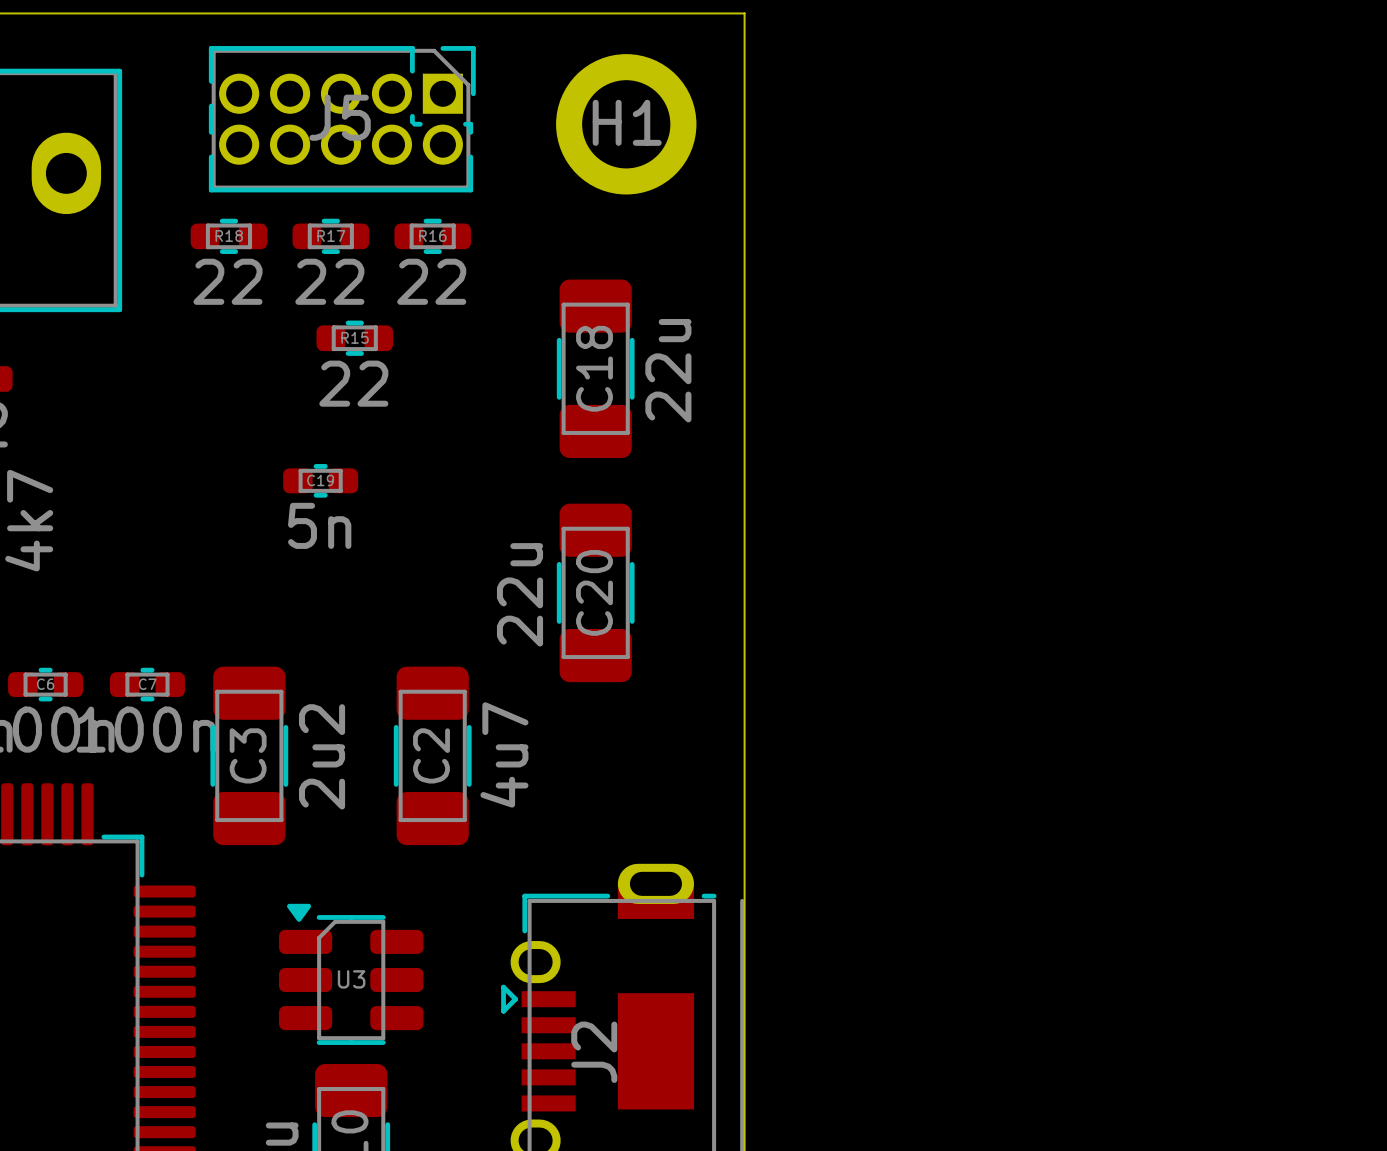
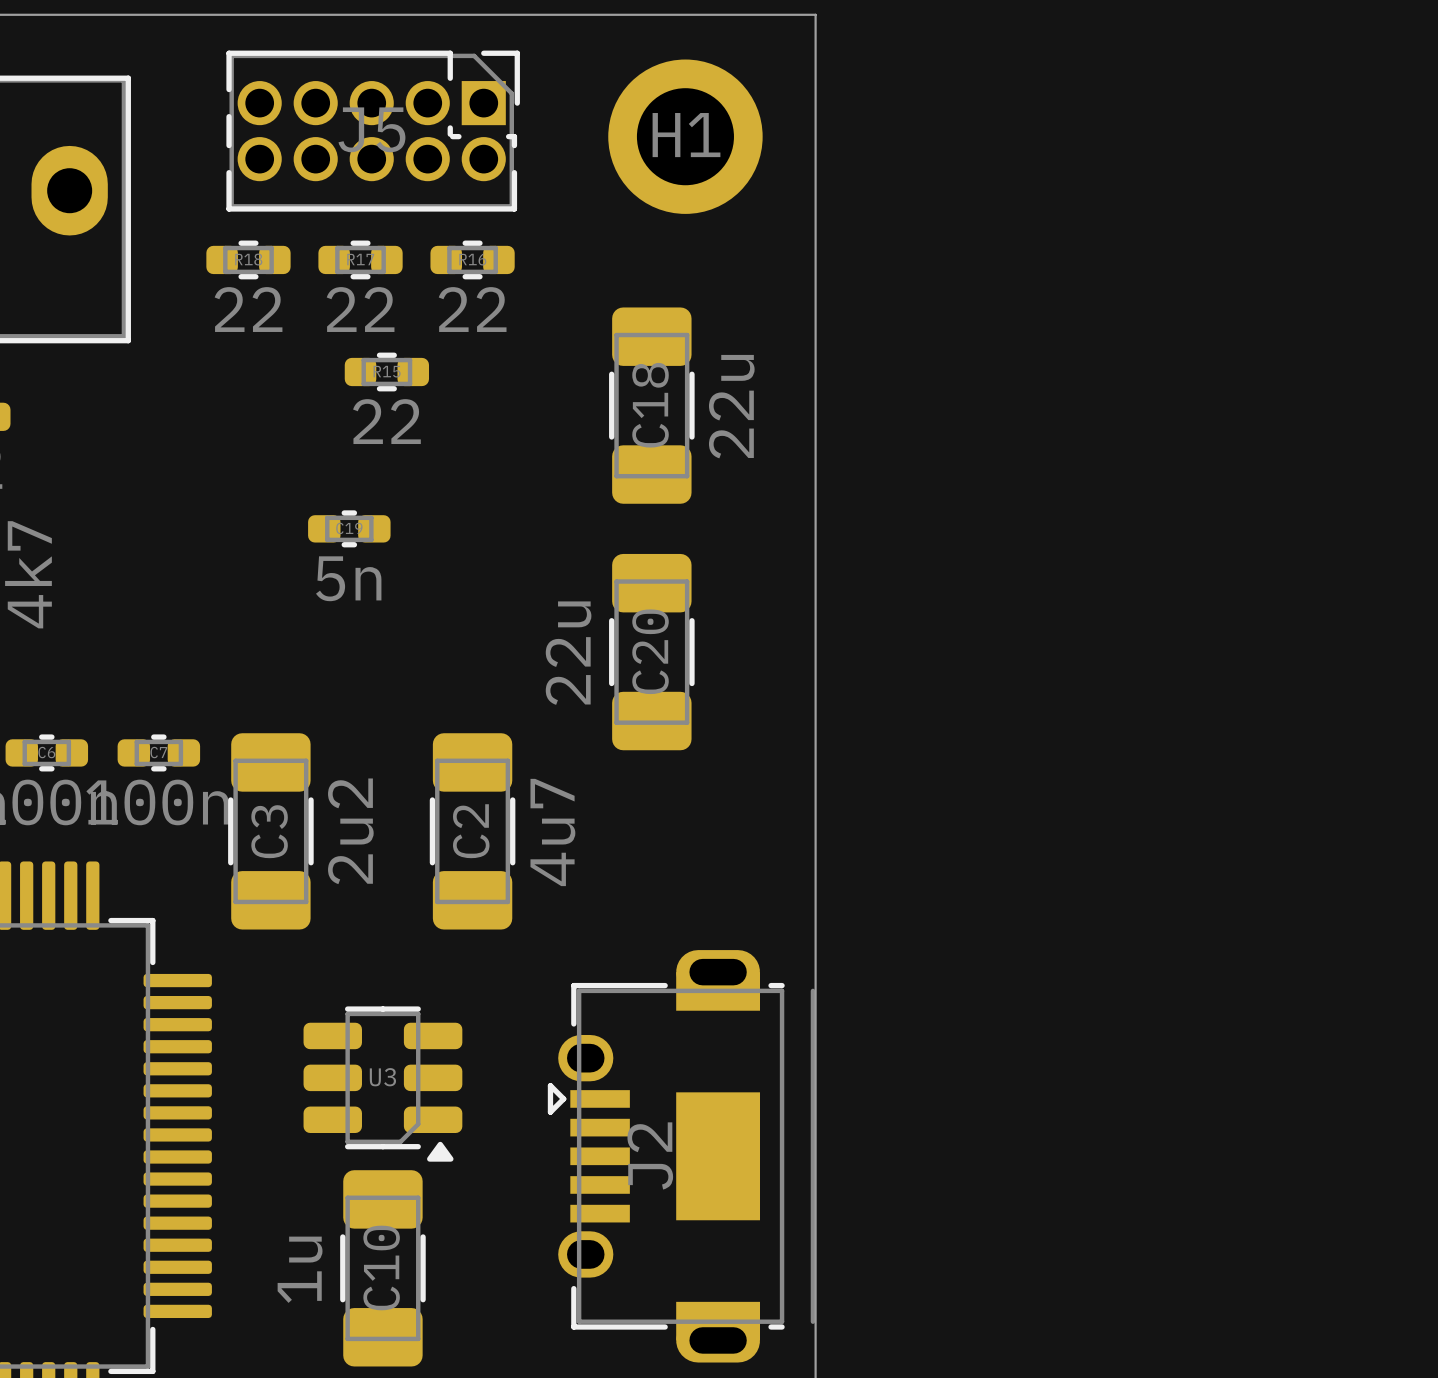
U3 rotation: 0° (351, 974) -> 180° (382, 1084)

